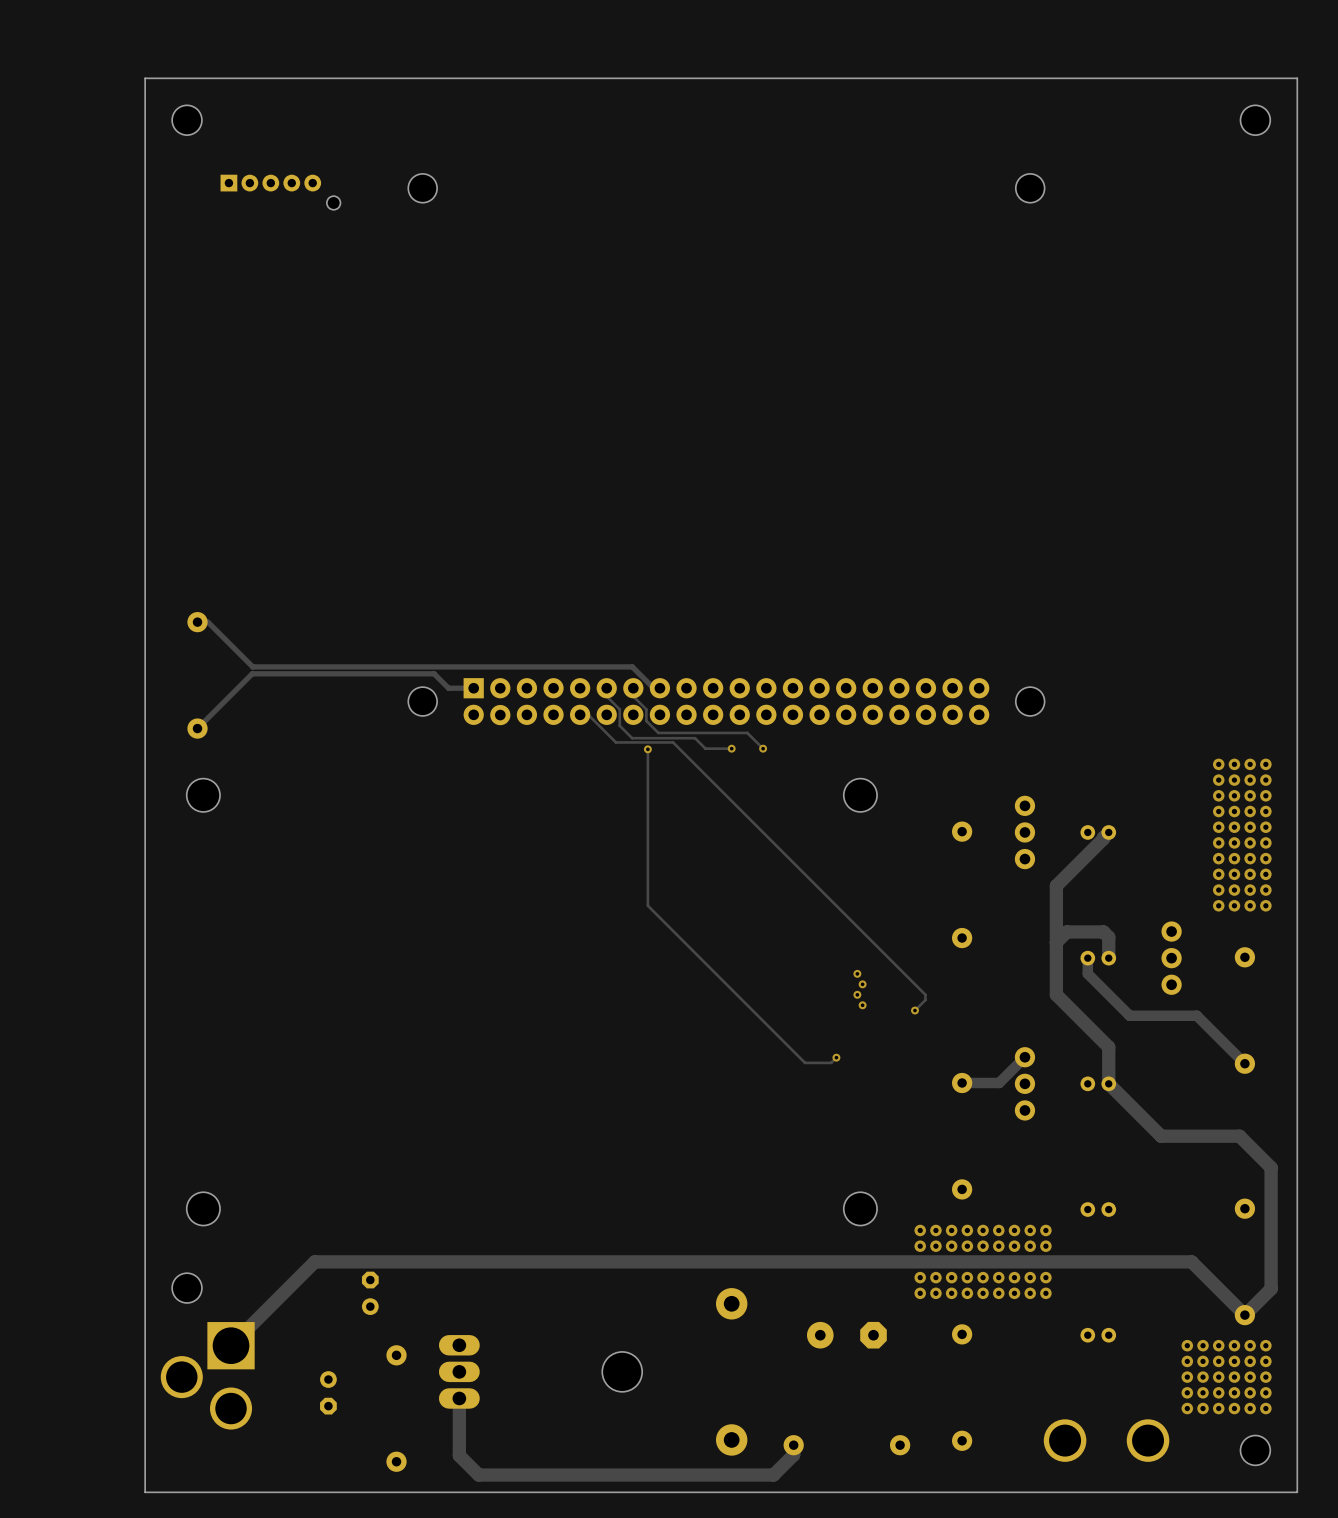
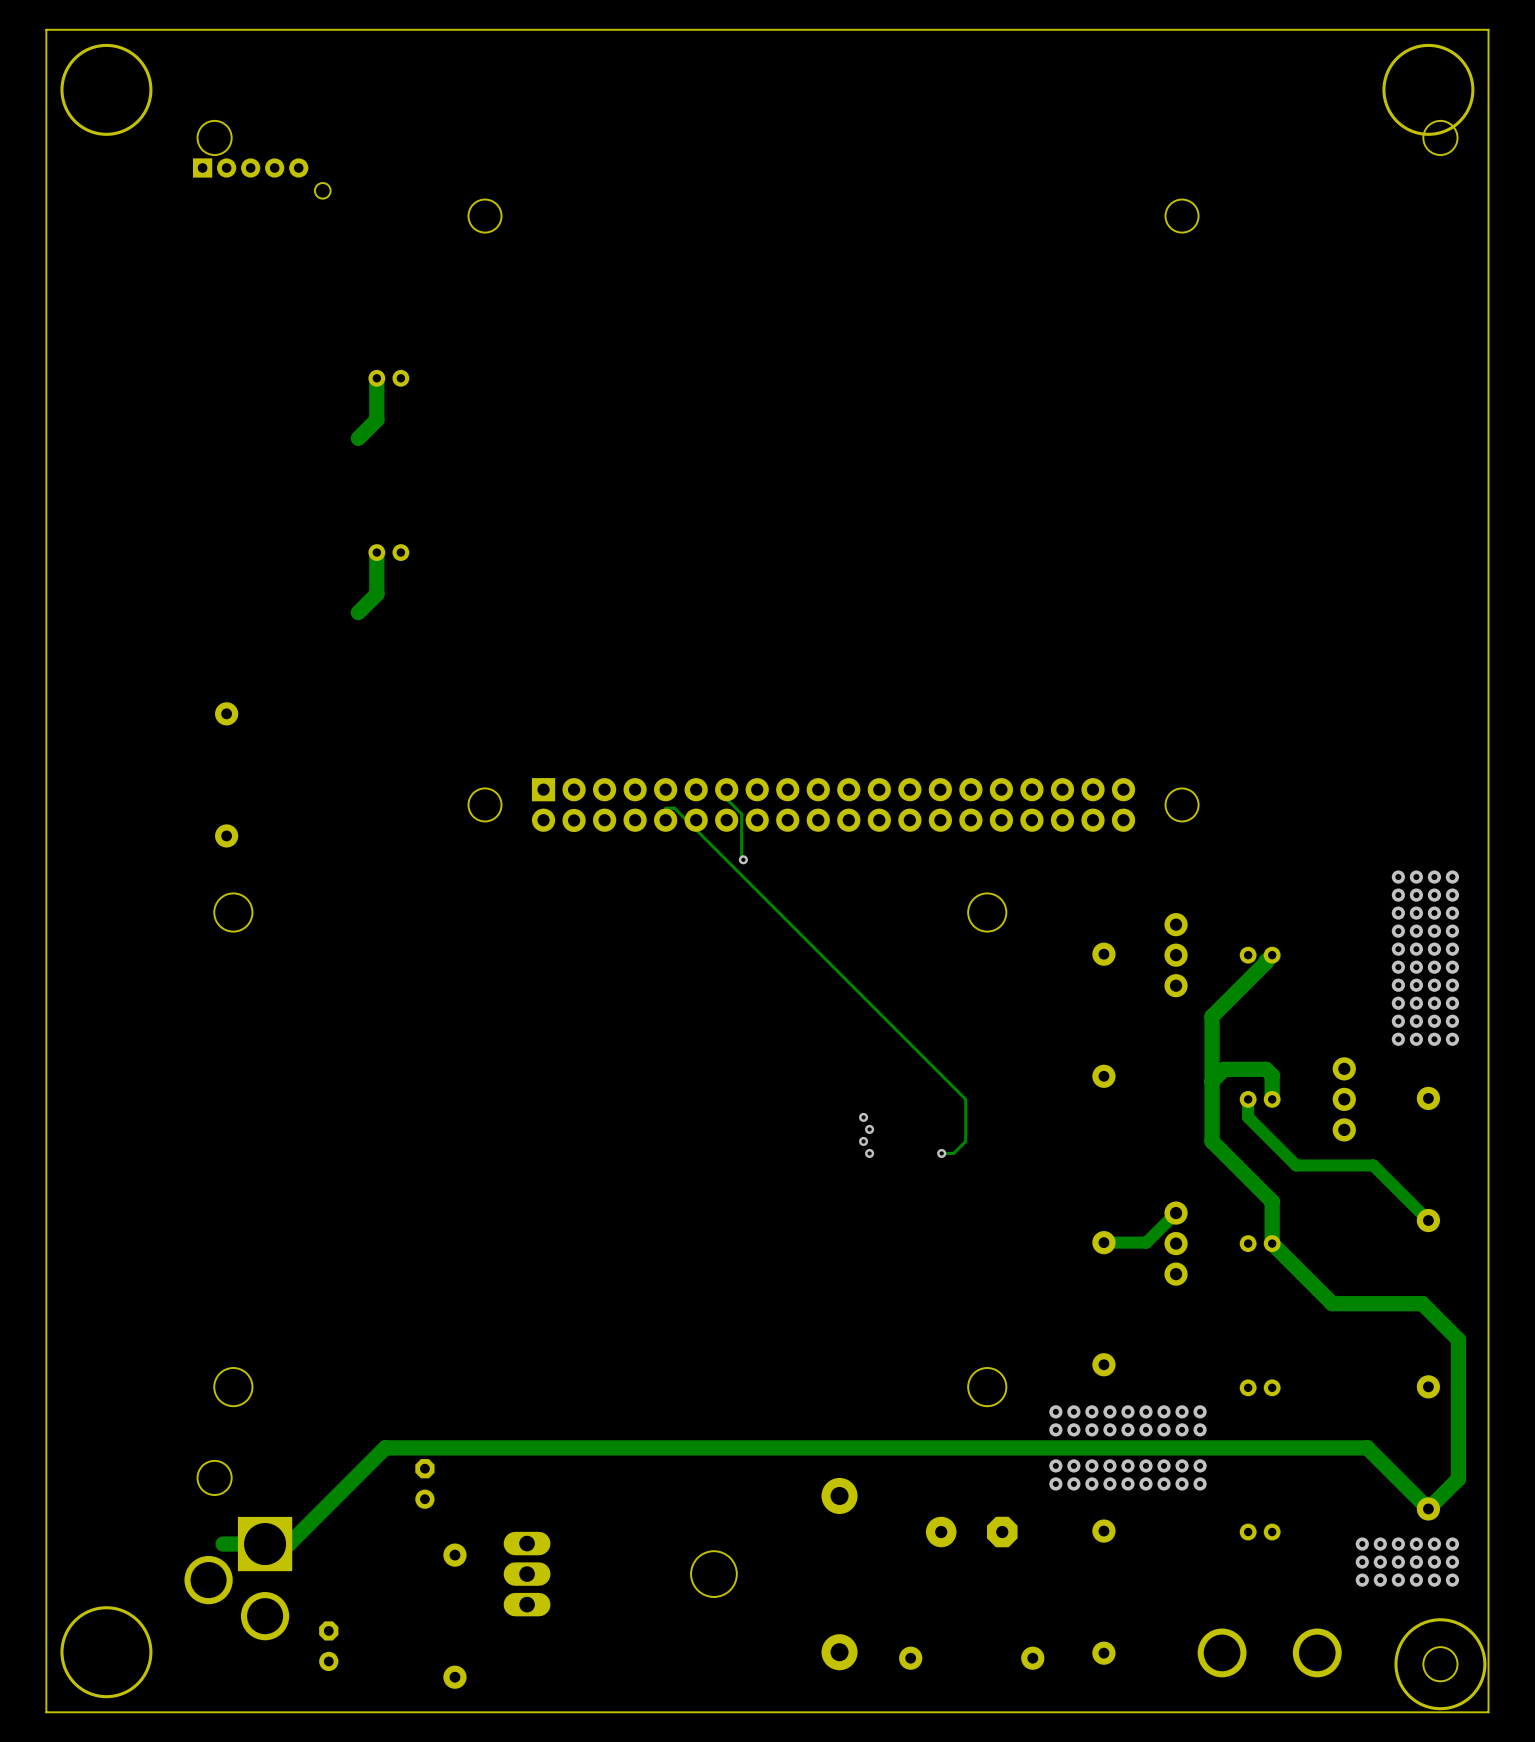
round board edge: none -> [60, 43, 153, 136]
round board edge: none -> [1382, 43, 1475, 136]
board edge: (1297, 78) (145, 78) (145, 1492) -> (1488, 89) (1488, 29) (46, 29) (46, 1712) (166, 1712)
part position: (280, 192) -> (261, 178)
track: none -> (376, 378) (376, 419) (358, 438)
part: none -> (388, 378)
track: none -> (376, 552) (376, 594) (358, 612)
part: none -> (388, 552)
track: (197, 622) (207, 622) (252, 666) (632, 666) (653, 688) (659, 688) -> none
track: (473, 688) (448, 688) (434, 673) (252, 673) (197, 728) -> none
track: (606, 688) (606, 696) (619, 709) (619, 725) (632, 738) (695, 738) (705, 748) (731, 748) -> none
track: none -> (665, 808) (674, 808) (965, 1099) (965, 1141) (953, 1153) (941, 1153)
track: (580, 714) (588, 714) (615, 742) (673, 742) (925, 994) (925, 1000) (914, 1010) -> none
track: (646, 720) (658, 732) (747, 732) (763, 748) -> (741, 827) (741, 857) (743, 859)
via: (731, 748) -> none
via: (763, 748) -> none
track: (647, 749) (647, 905) (805, 1062) (831, 1062) (836, 1057) -> none
via: none -> (863, 1117)
via: (857, 973) -> none
via: none -> (869, 1129)
via: (862, 984) -> none
via: none -> (863, 1141)
via: (857, 994) -> none
via: none -> (869, 1153)
via: none -> (941, 1153)
via: (862, 1005) -> none
via: (914, 1010) -> none
via: (836, 1057) -> none
track: (335, 1261) (314, 1261) (231, 1345) -> (385, 1447) (289, 1544) (223, 1544)
part rotation: 0° (328, 1392) -> 180° (328, 1646)
part position: (328, 1392) -> (328, 1646)
via: (1187, 1392) -> none
via: (1203, 1392) -> none
via: (1218, 1392) -> none
via: (1234, 1392) -> none
via: (1250, 1392) -> none
via: (1265, 1392) -> none
track: (459, 1398) (459, 1455) (478, 1475) (773, 1475) (793, 1454) (793, 1445) -> none
round board edge: none -> [60, 1606, 153, 1699]
via: (1187, 1408) -> none
via: (1203, 1408) -> none
via: (1218, 1408) -> none
via: (1234, 1408) -> none
via: (1250, 1408) -> none
via: (1265, 1408) -> none
round board edge: none -> [1394, 1618, 1487, 1711]

